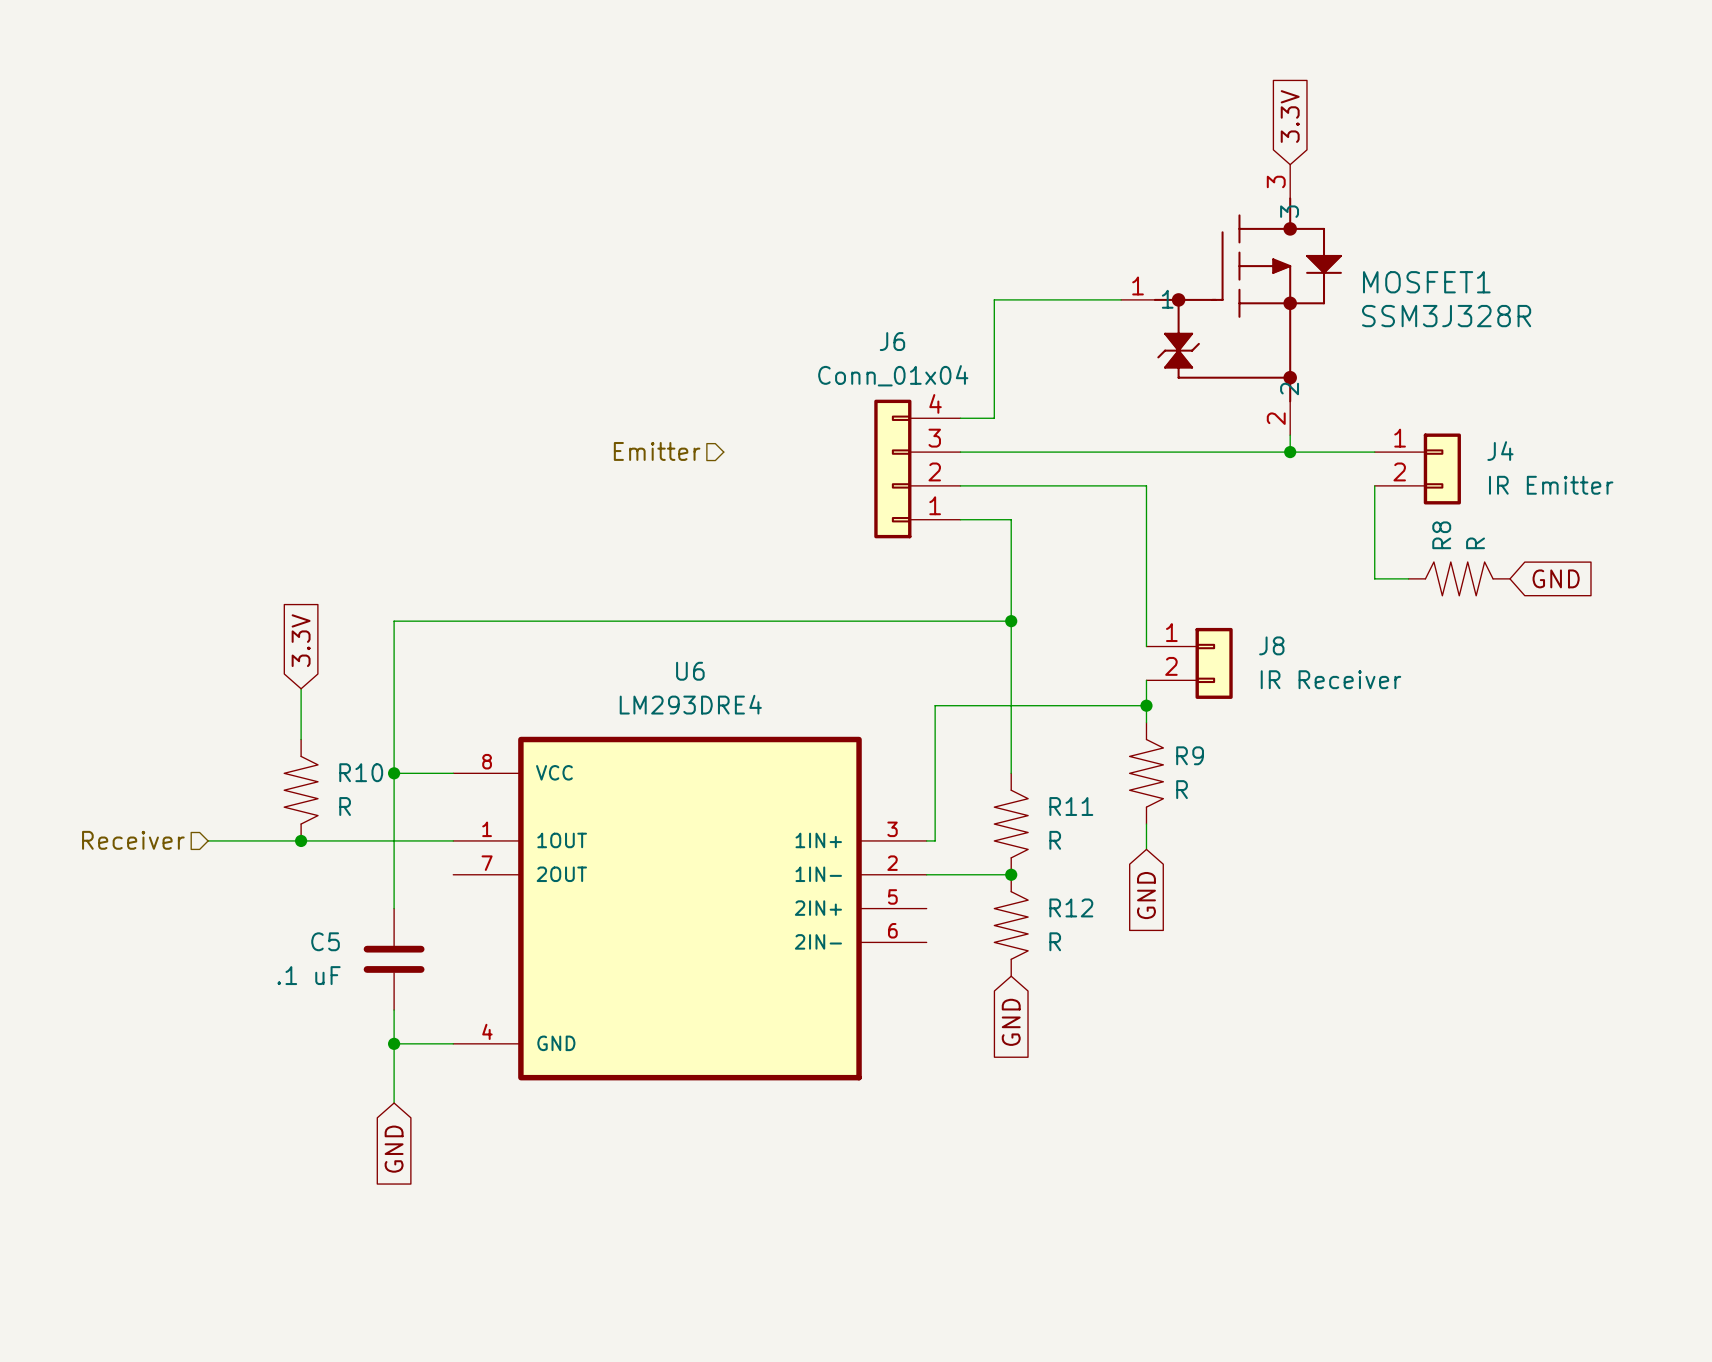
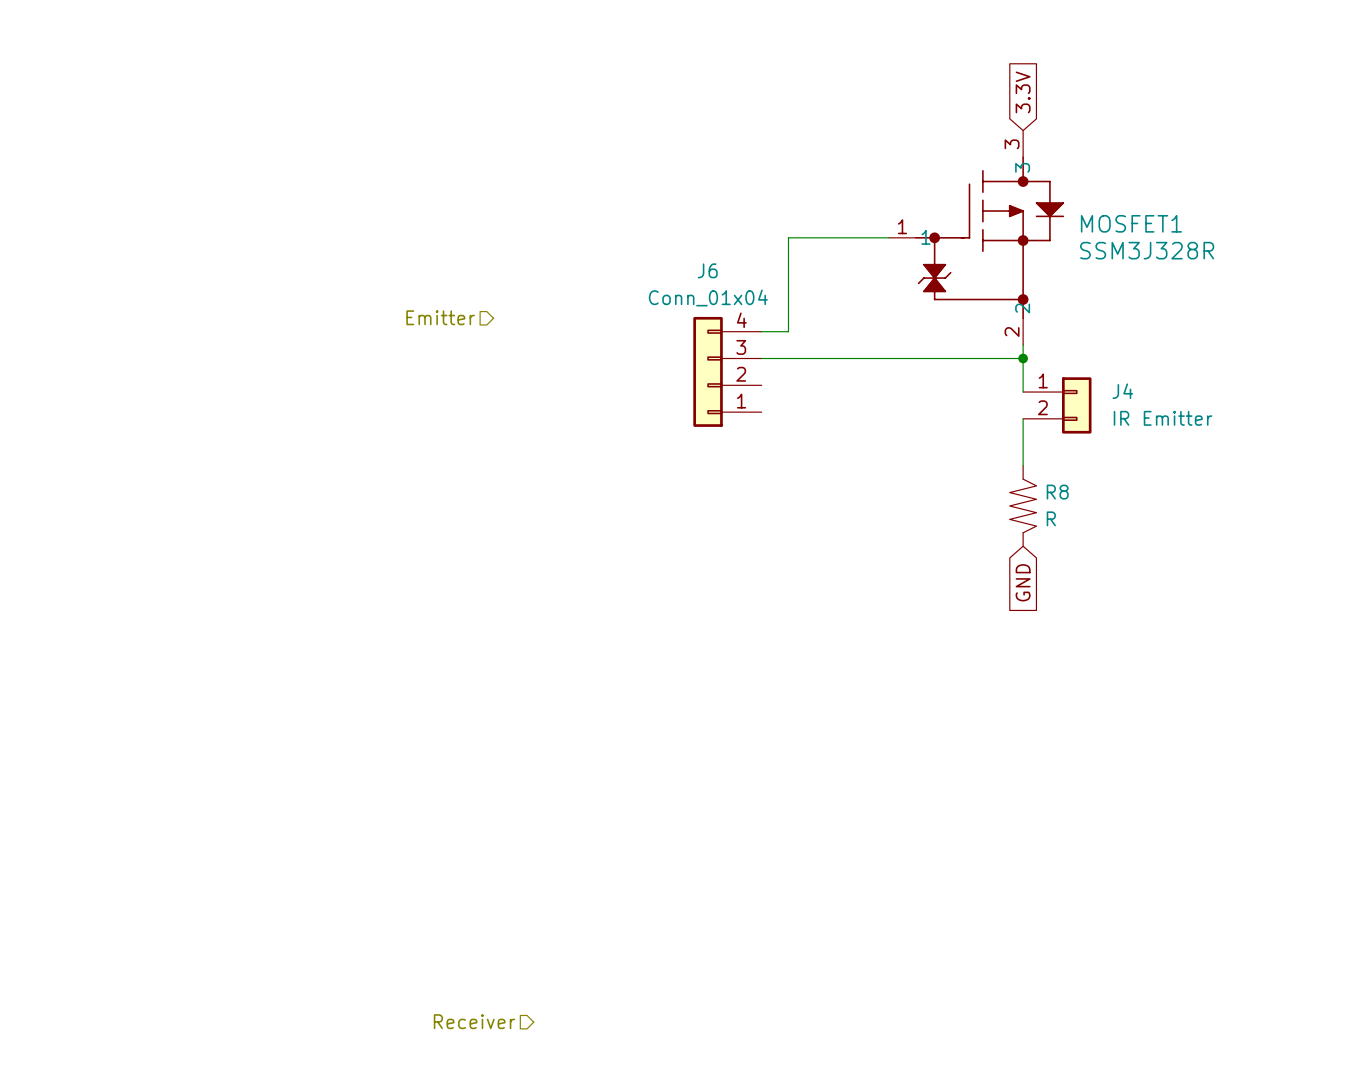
hierarchical label position: Emitter (657, 451) -> Emitter (440, 317)
wire: (1290, 452) (1374, 452) -> (1023, 358) (1023, 392)
J4 position: (1417, 468) -> (1057, 405)
wire: (960, 485) (1146, 485) (1146, 646) -> none
wire: (1374, 485) (1374, 578) (1408, 578) -> none
wire: (960, 519) (1011, 519) (1011, 773) -> none
wire: none -> (1023, 418) (1023, 465)
R8 rotation: 0° (1459, 578) -> 90° clockwise (1023, 505)
R8 position: (1459, 578) -> (1023, 505)
global label: GND (1556, 578) -> none
wire: (1011, 621) (394, 621) (394, 908) -> none
junction: (1011, 621) -> none
global label: 3.3V (301, 640) -> none
J8: IR Receiver (1189, 663) -> none
wire: (1146, 680) (1146, 722) -> none
wire: (301, 688) (301, 739) -> none
wire: (1146, 705) (935, 705) (935, 840) (926, 840) -> none
junction: (1146, 705) -> none
global label: none -> GND (1023, 582)
wire: (394, 773) (453, 773) -> none
junction: (394, 773) -> none
R9: R (1146, 773) -> none
R10: R (301, 790) -> none
R11: R (1011, 824) -> none
wire: (1146, 824) (1146, 849) -> none
hierarchical label: Receiver (133, 840) -> none
wire: (208, 840) (453, 840) -> none
junction: (301, 840) -> none
wire: (926, 874) (1011, 874) -> none
junction: (1011, 874) -> none
global label: GND (1146, 895) -> none
U6: LM293DRE4 (689, 908) -> none
R12: R (1011, 925) -> none
C5: .1 uF (394, 959) -> none
wire: (394, 1010) (394, 1103) -> none
global label: GND (1011, 1022) -> none
wire: (394, 1043) (453, 1043) -> none
junction: (394, 1043) -> none
global label: GND (394, 1149) -> none
hierarchical label: none -> Receiver (474, 1021)

